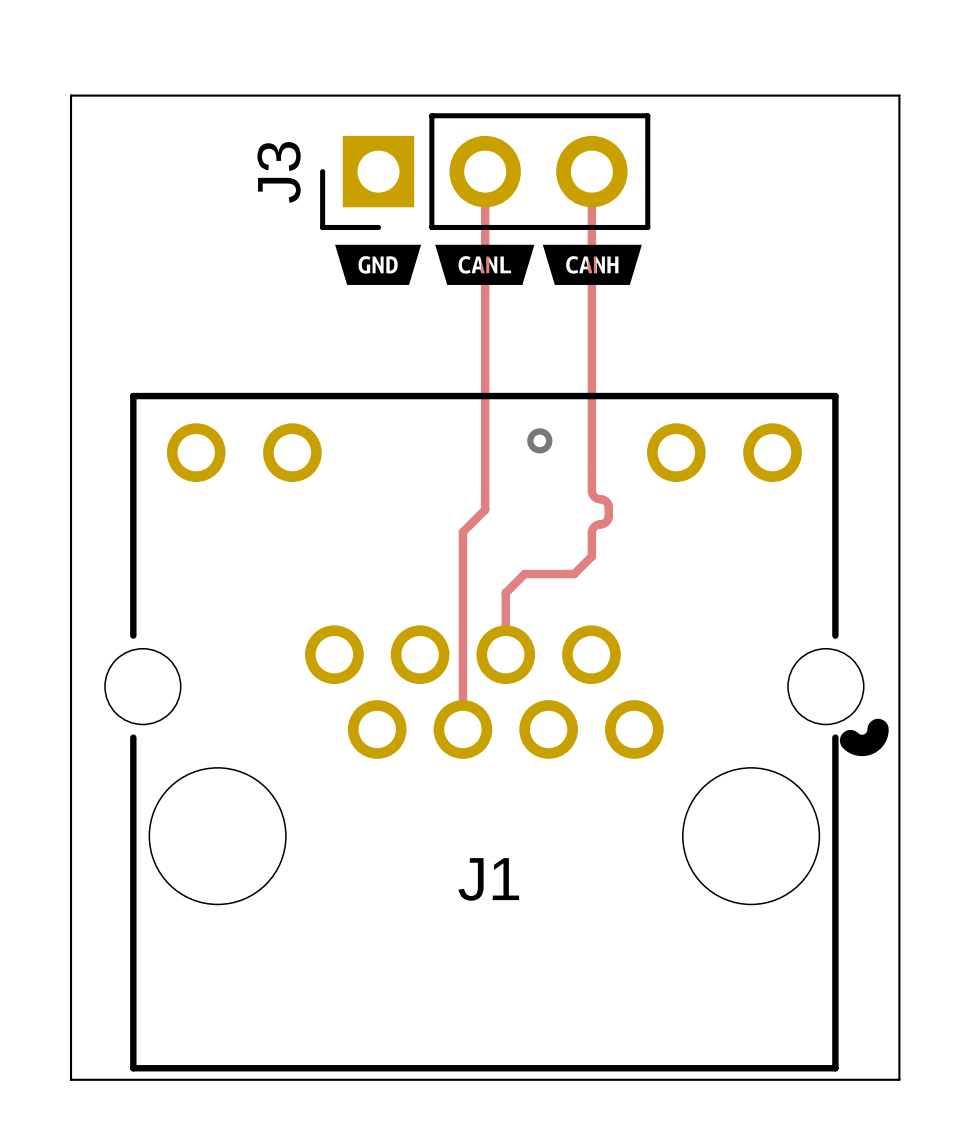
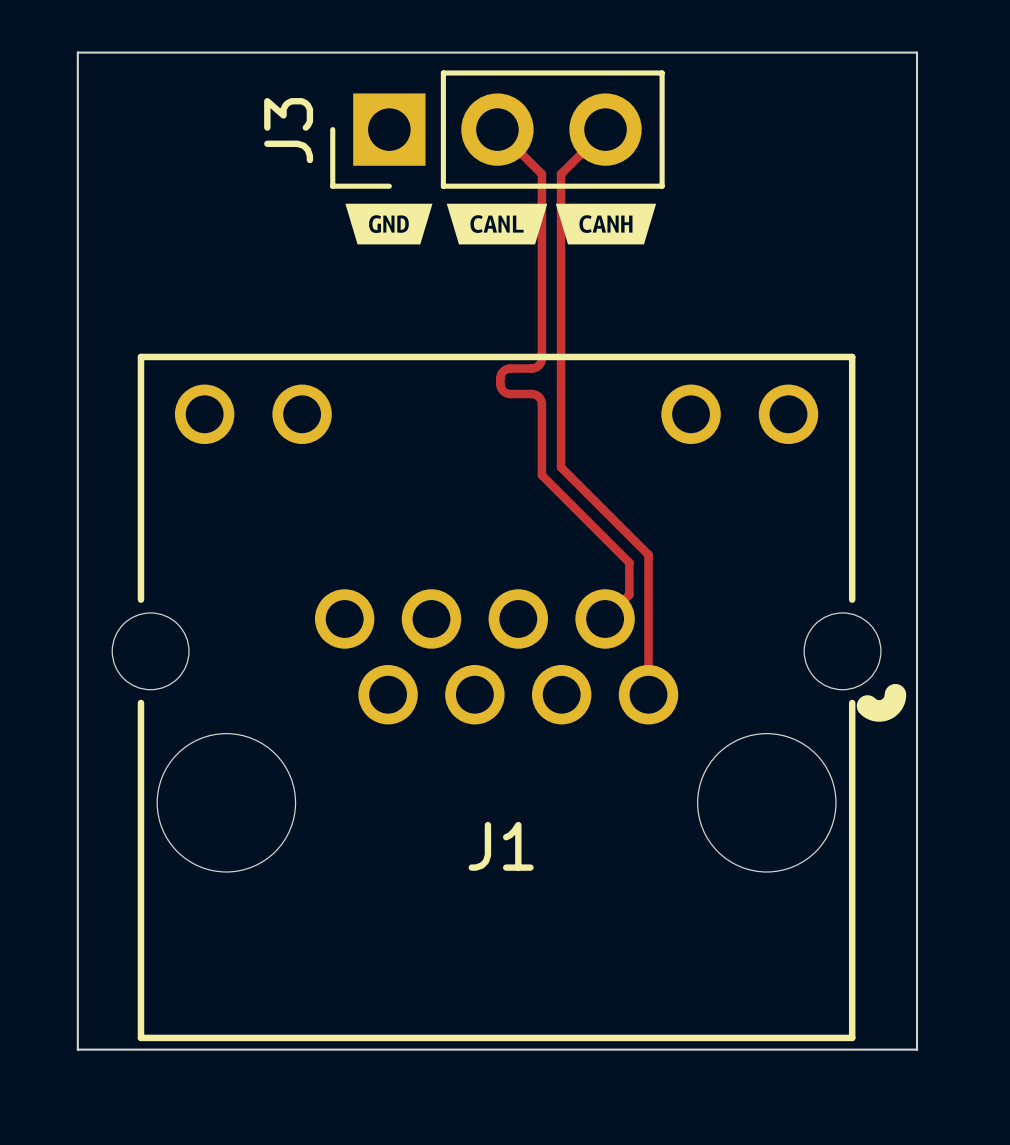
track: (485, 171) (485, 509) (462, 532) (462, 729) -> (497, 129) (541, 174) (541, 360) (538, 365) (533, 368) (505, 370) (500, 376) (500, 386) (507, 393) (532, 394) (539, 397) (541, 404) (541, 475) (629, 562) (629, 594) (605, 618)
track: (591, 171) (591, 490) (595, 497) (607, 503) (608, 517) (605, 522) (593, 528) (591, 556) (574, 574) (524, 574) (505, 592) (505, 654) -> (605, 129) (561, 174) (561, 467) (648, 554) (648, 694)
via: (539, 440) -> none

